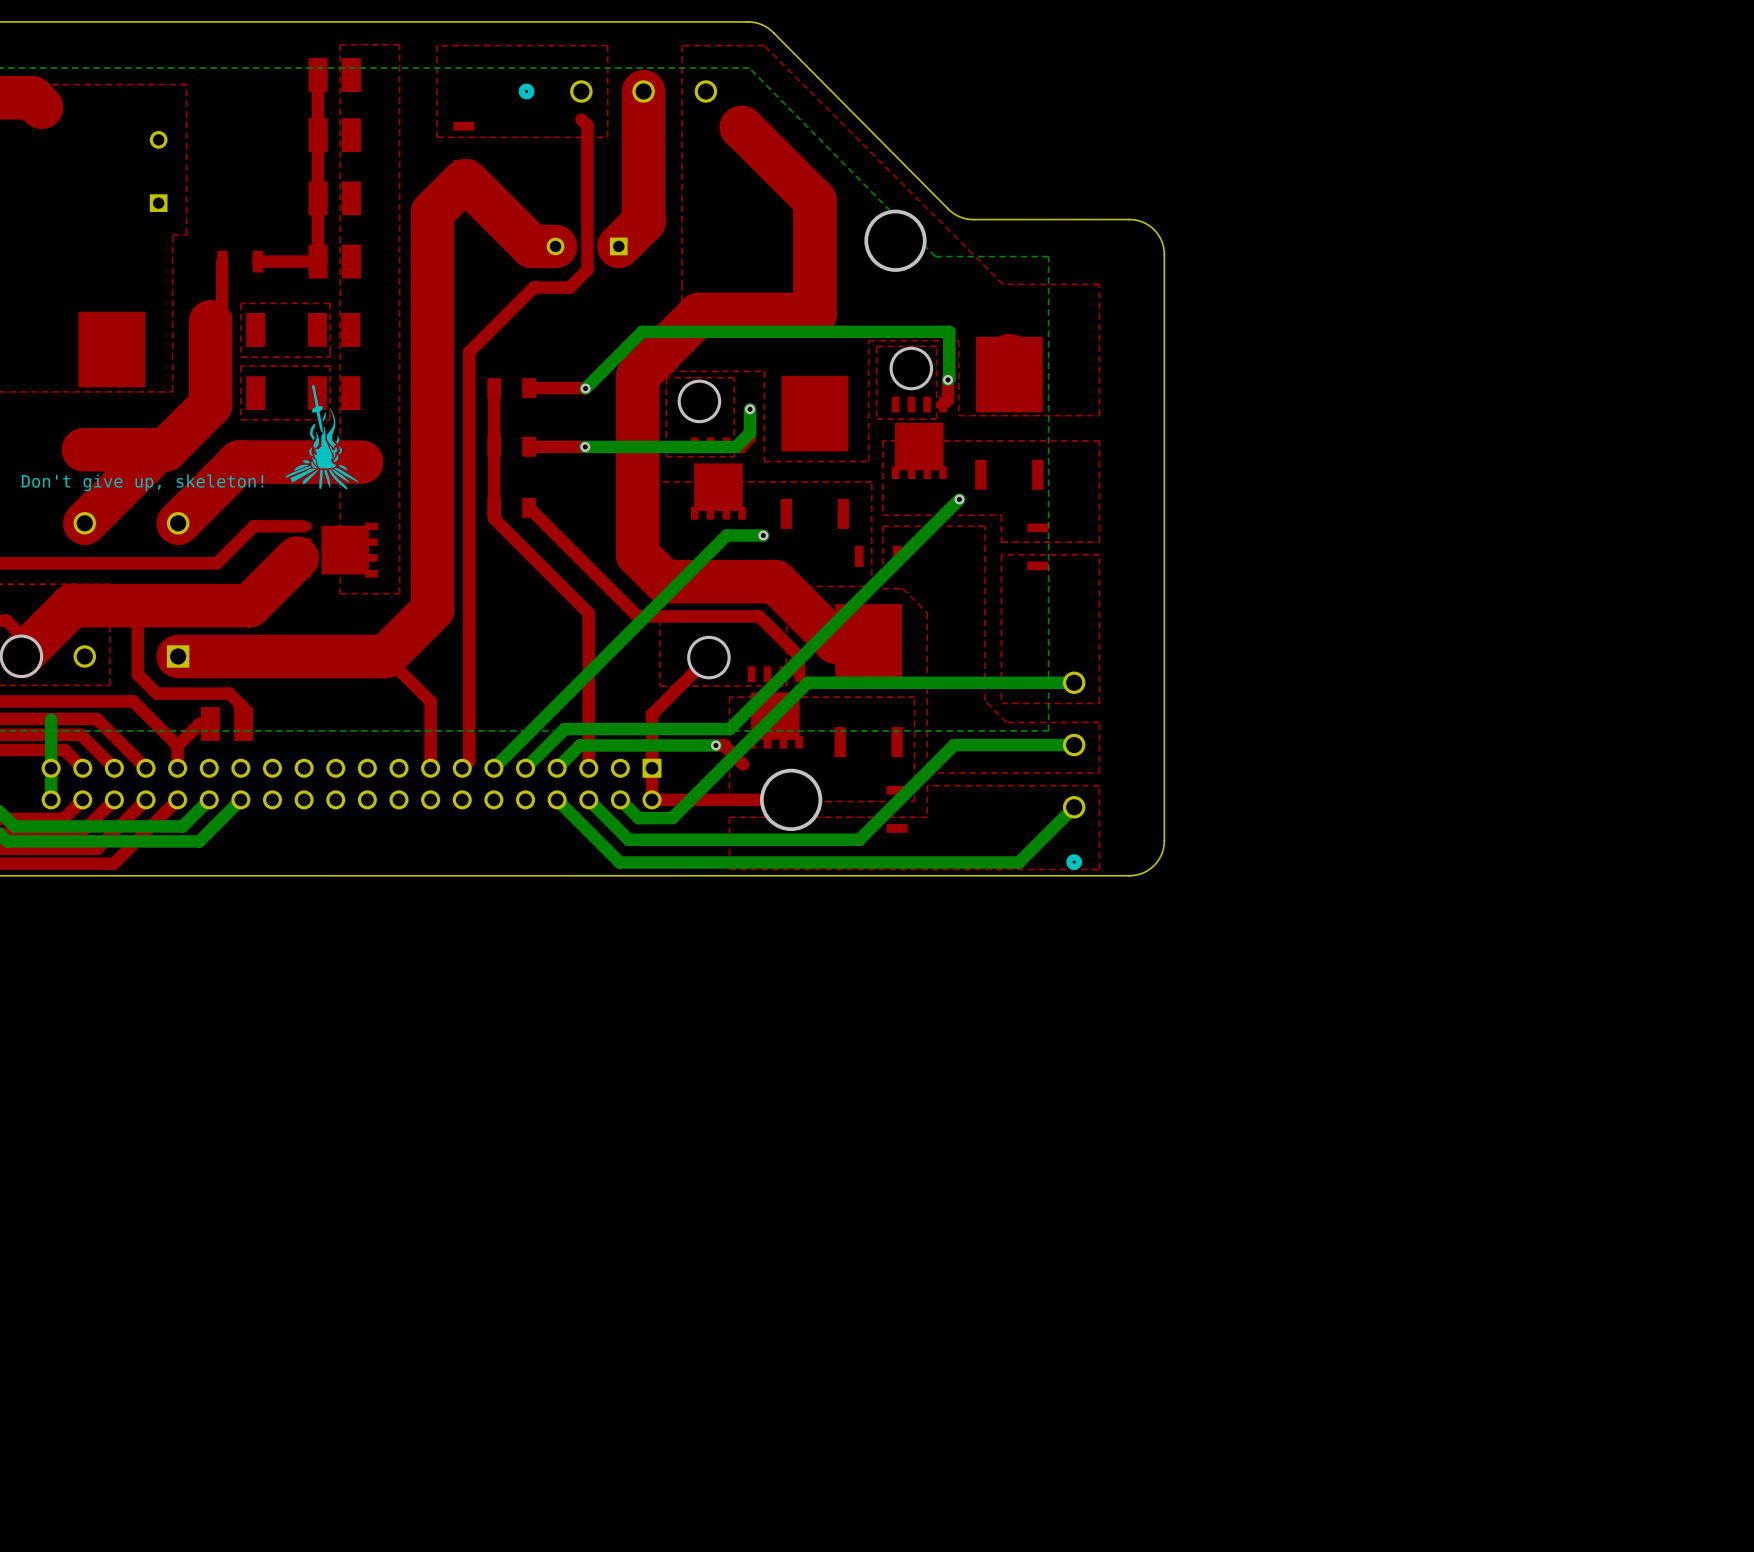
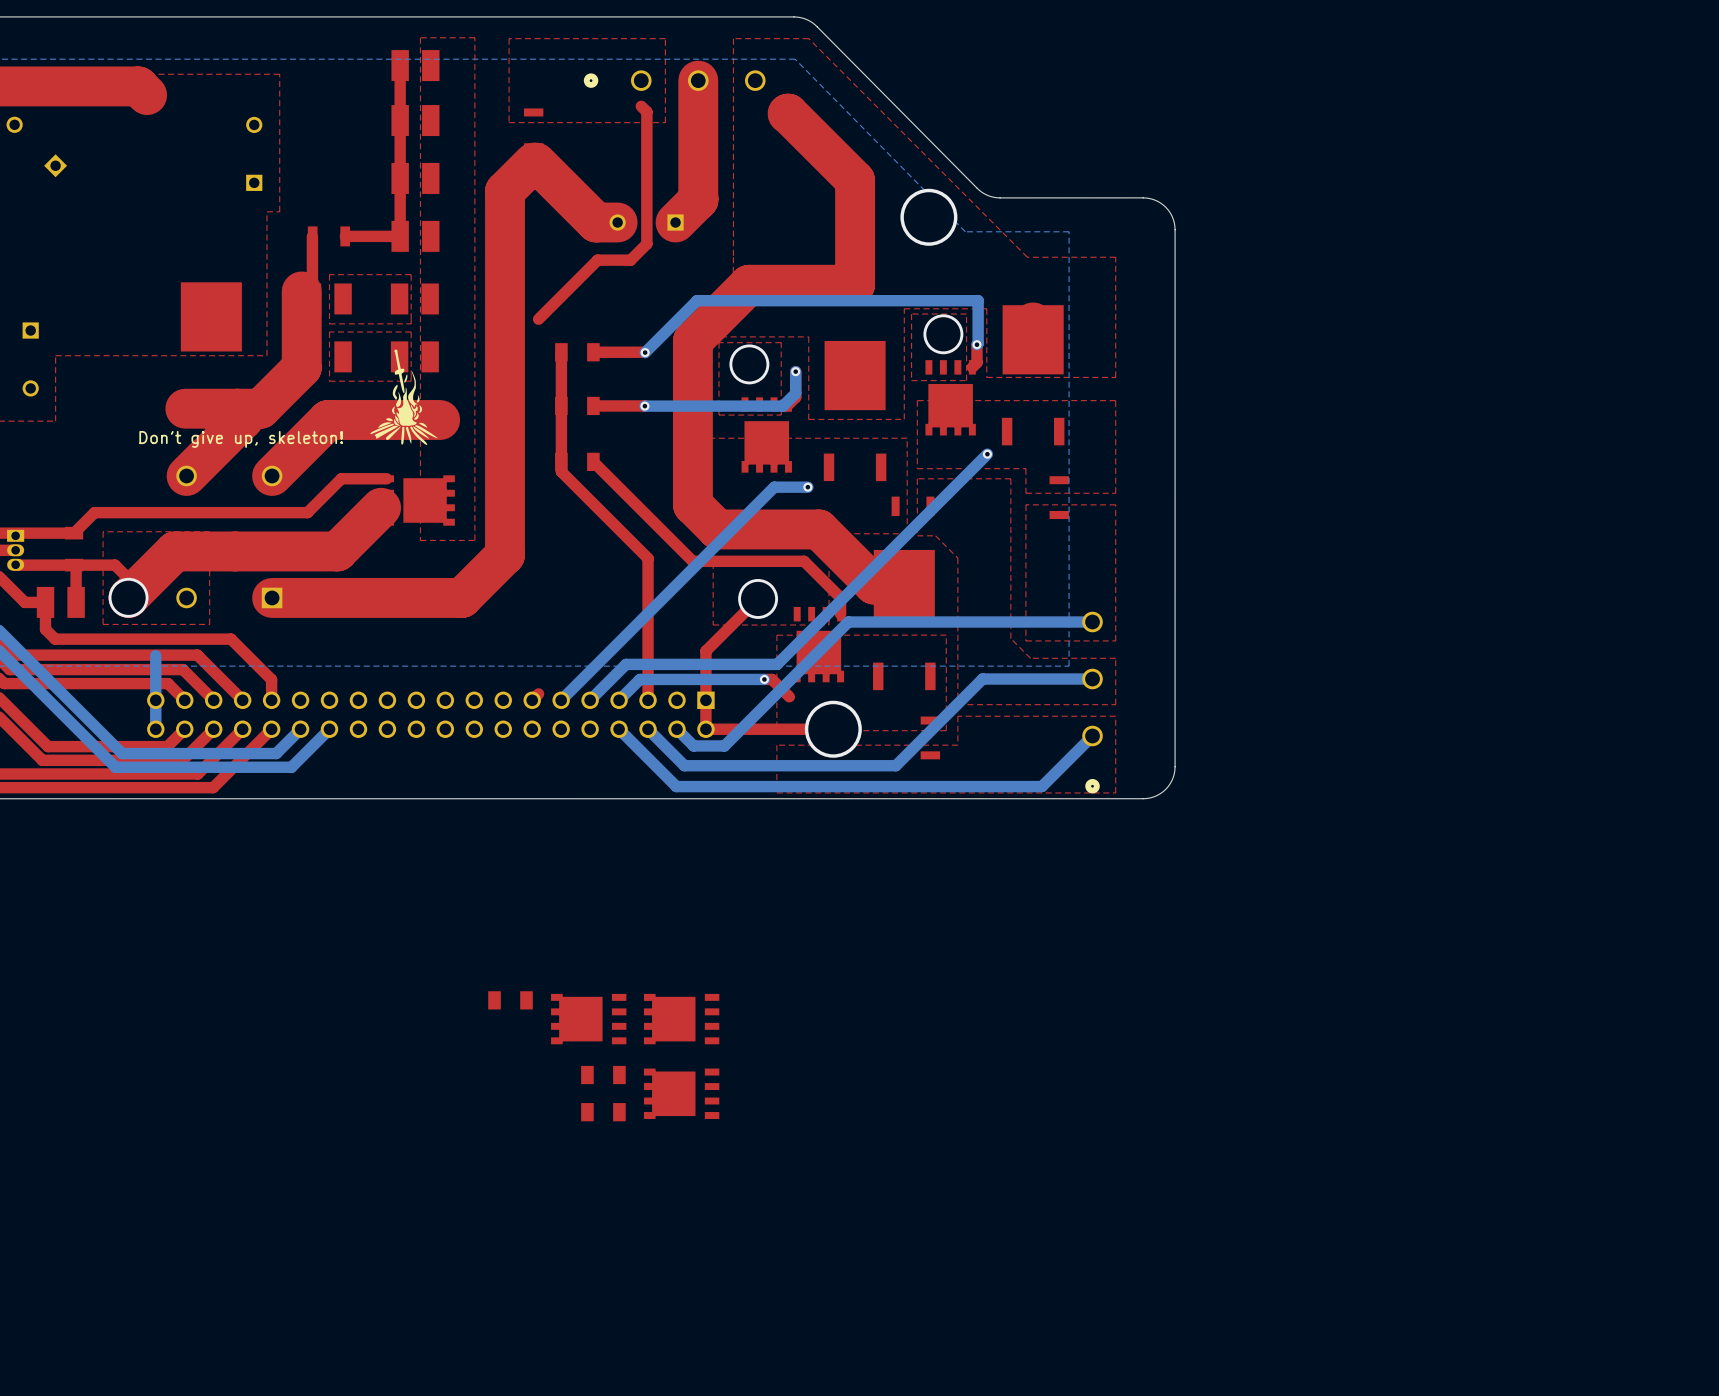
top track: (469, 352) (469, 761) -> none
top track: (137, 605) (137, 674) (156, 693) (229, 693) (243, 707) (243, 723) -> none
top track: (385, 656) (430, 701) (430, 768) -> none
top track: (210, 723) (199, 723) (177, 745) -> none
part: (226, 723) -> none
part: none -> (510, 1000)
part: none -> (588, 1019)
part: none -> (681, 1019)
part: none -> (603, 1075)
part: none -> (681, 1093)
part: none -> (603, 1112)

